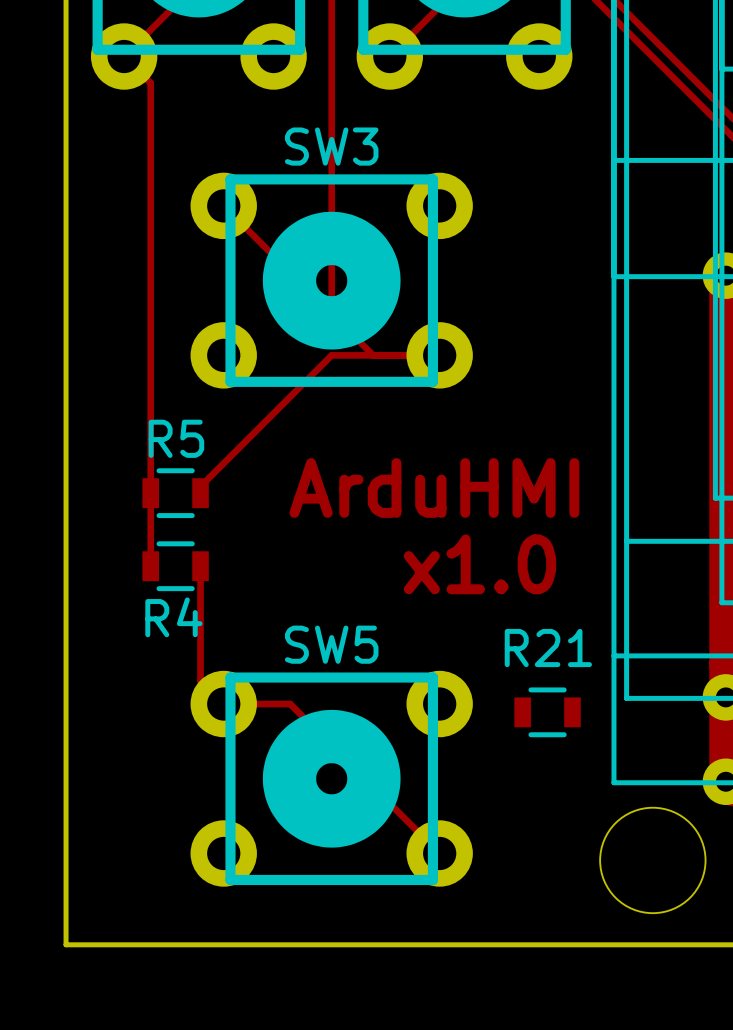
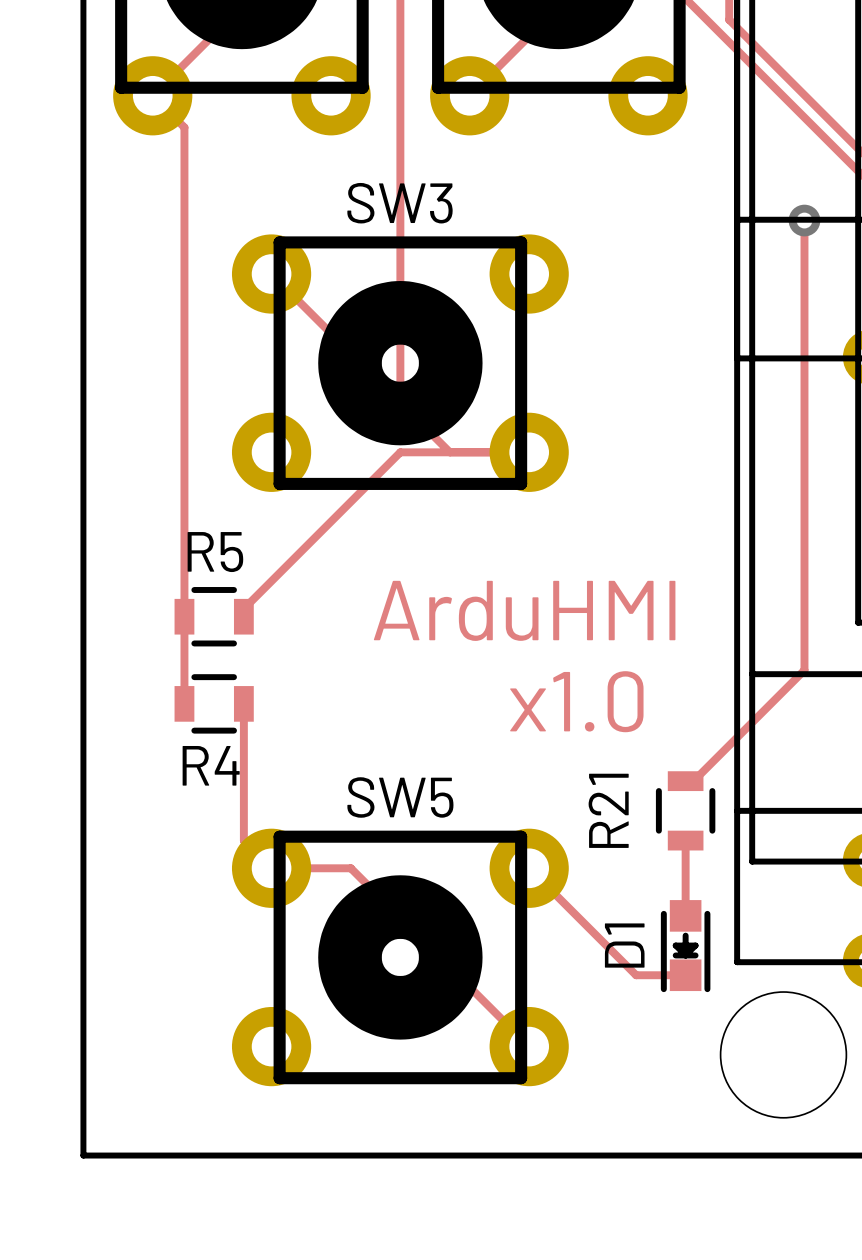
track: none -> (804, 220) (804, 670) (693, 781) (685, 781)
via: none -> (804, 220)
R21 name position: R21 (548, 648) -> R21 (608, 810)
track: none -> (685, 840) (685, 915)
track: none -> (529, 868) (636, 975) (685, 975)
R21 rotation: 0° (547, 712) -> 90° clockwise (685, 810)
R21 position: (547, 712) -> (685, 810)
D1: none -> (685, 946)

